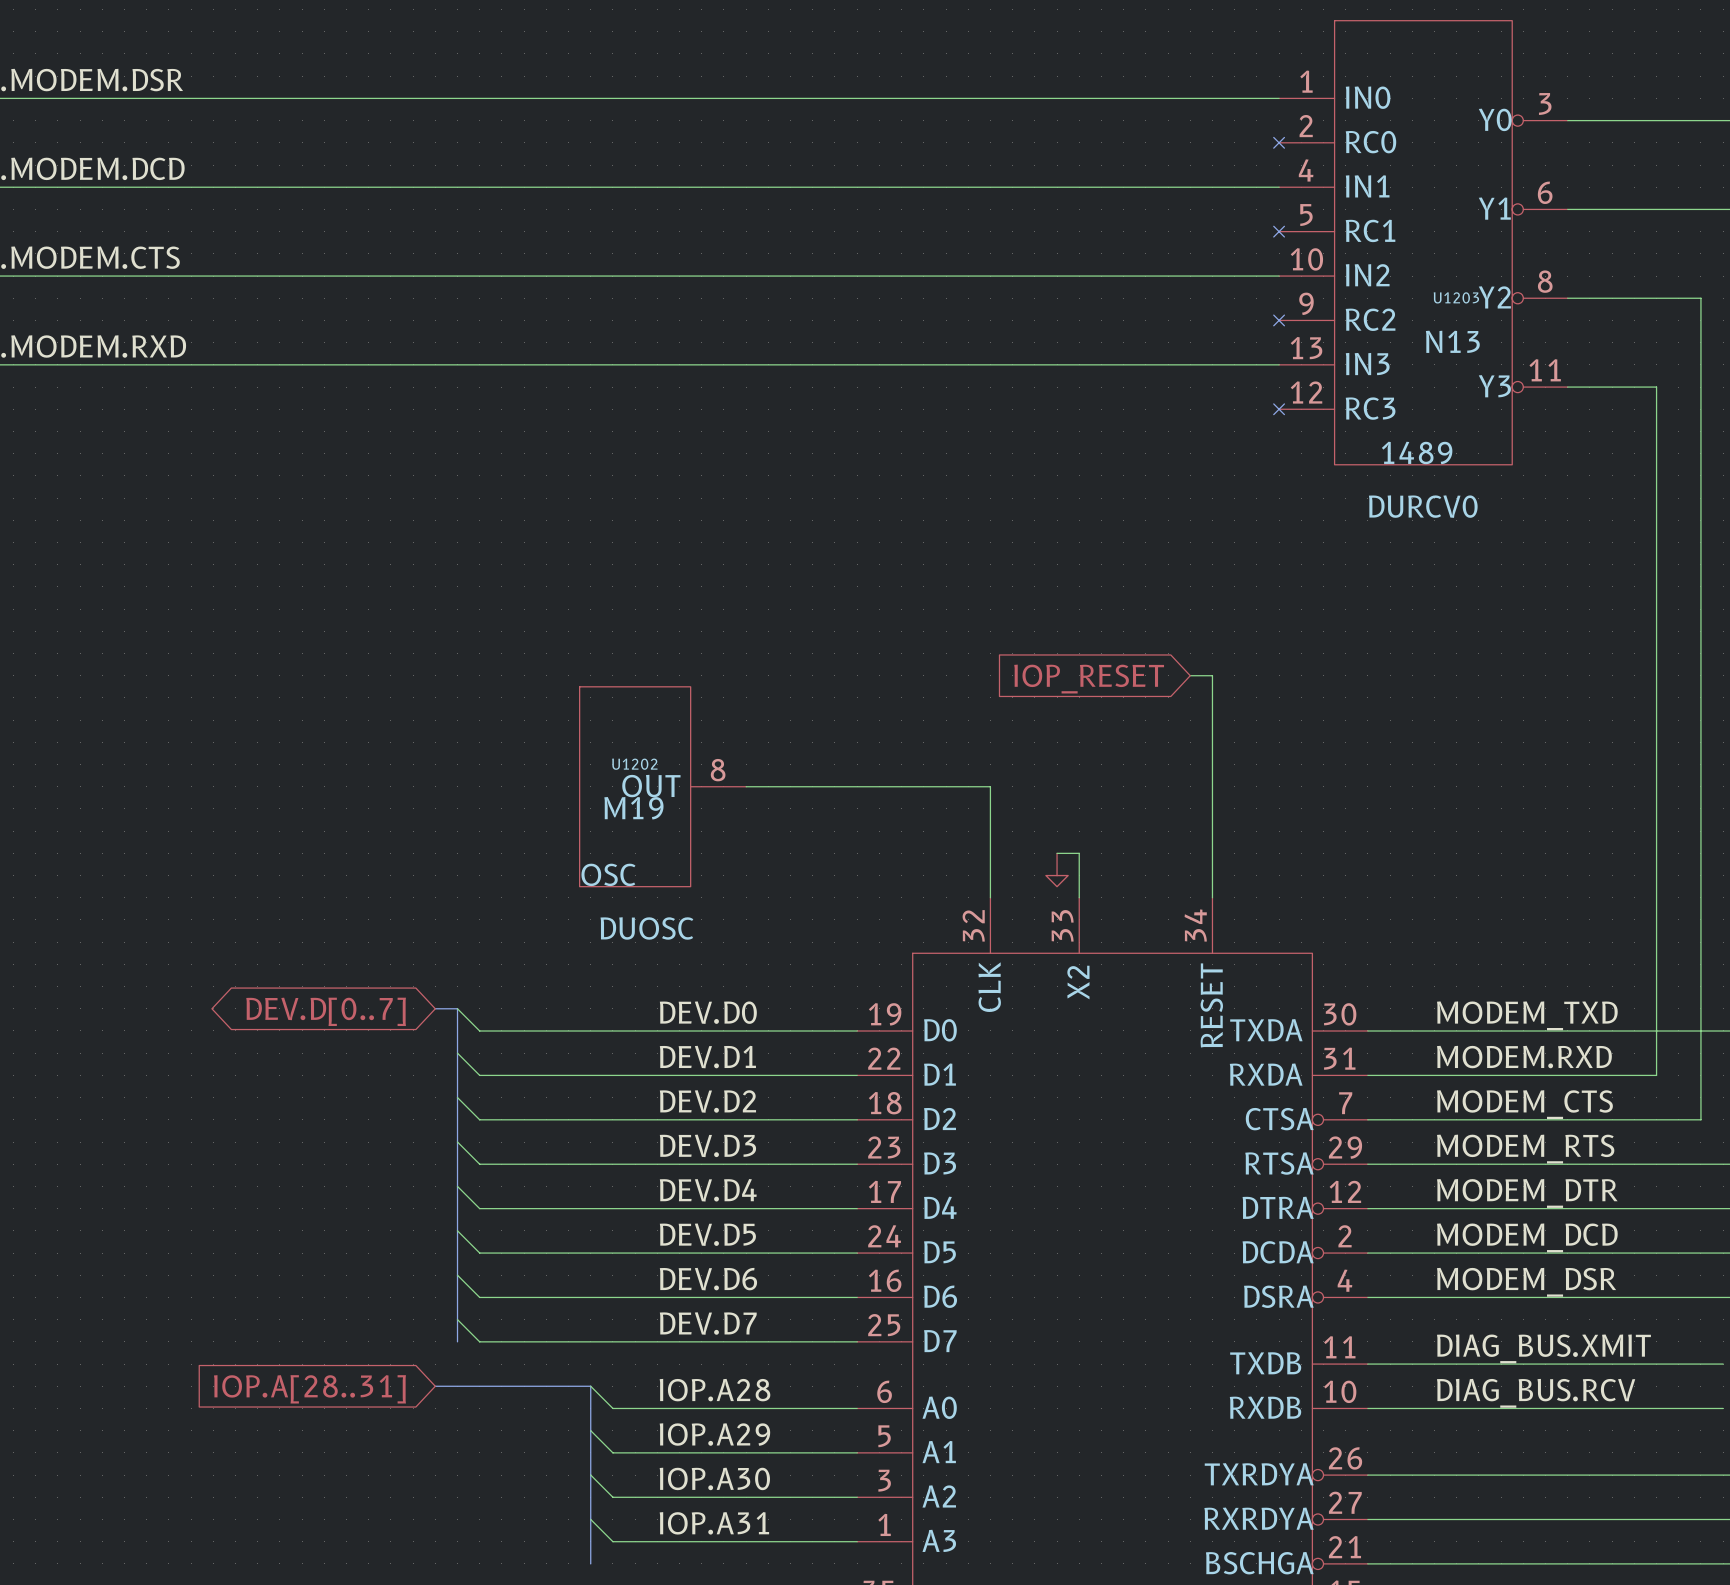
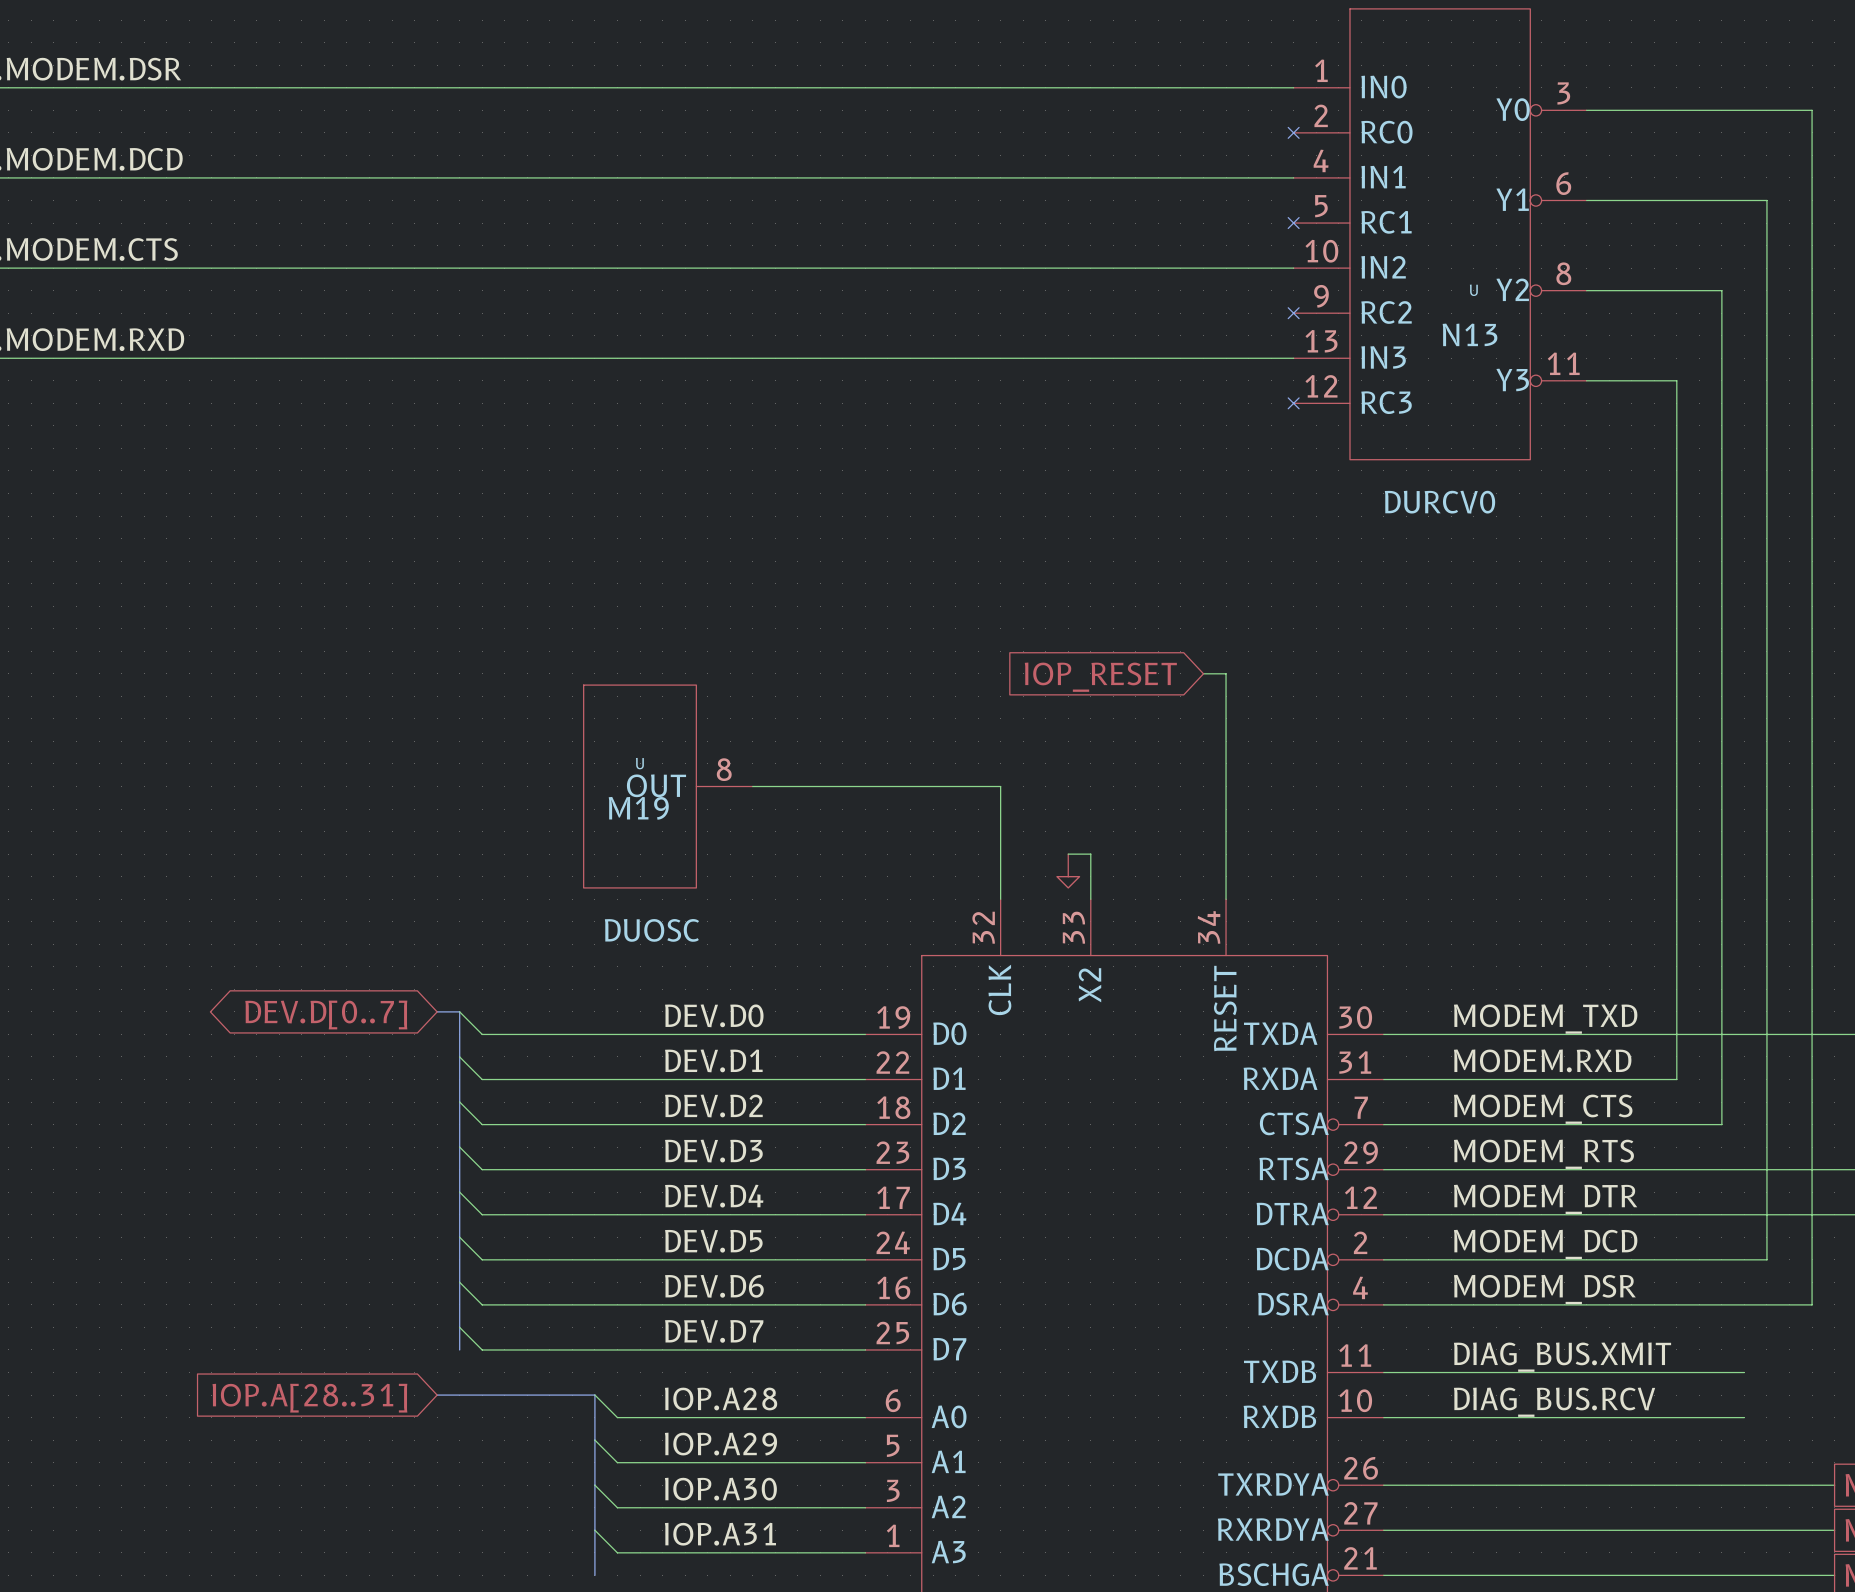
U1203 name: U1203 (1456, 297) -> U (1473, 290)
U1203 value: 1489 (1417, 452) -> none
U1202 name: U1202 (634, 764) -> U (639, 763)
U1202 value: OSC (608, 874) -> none

